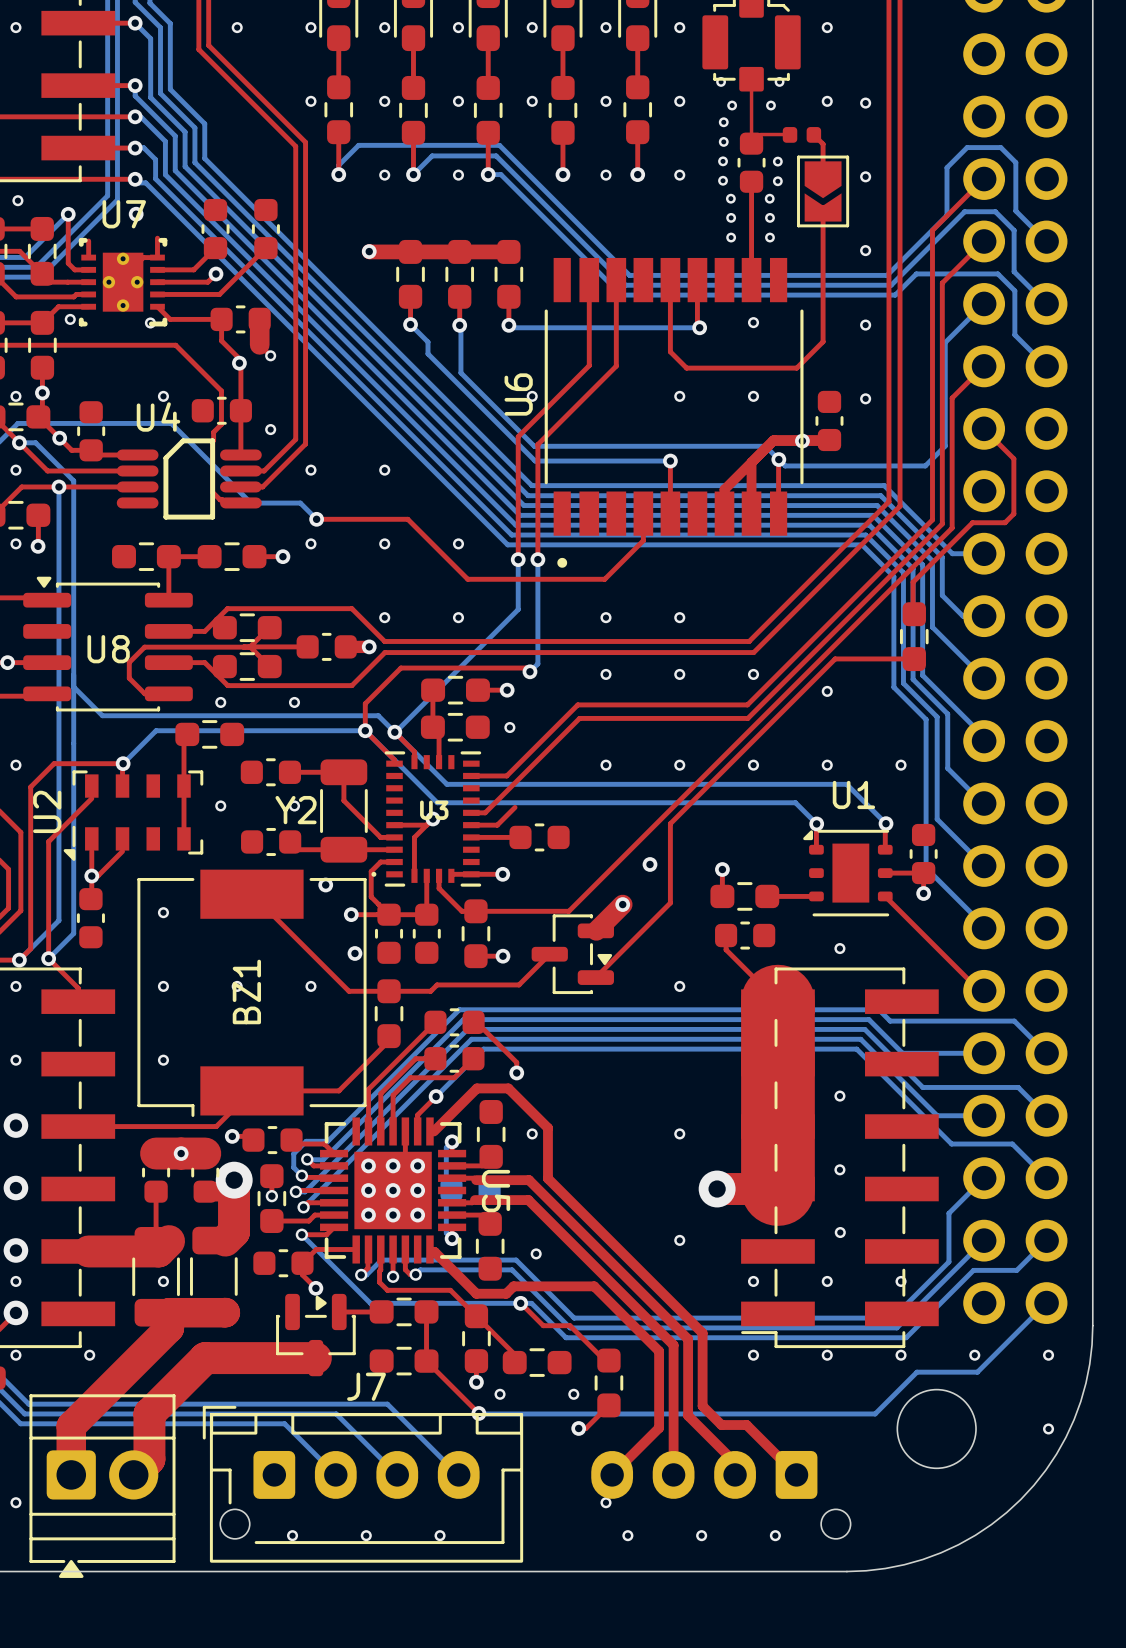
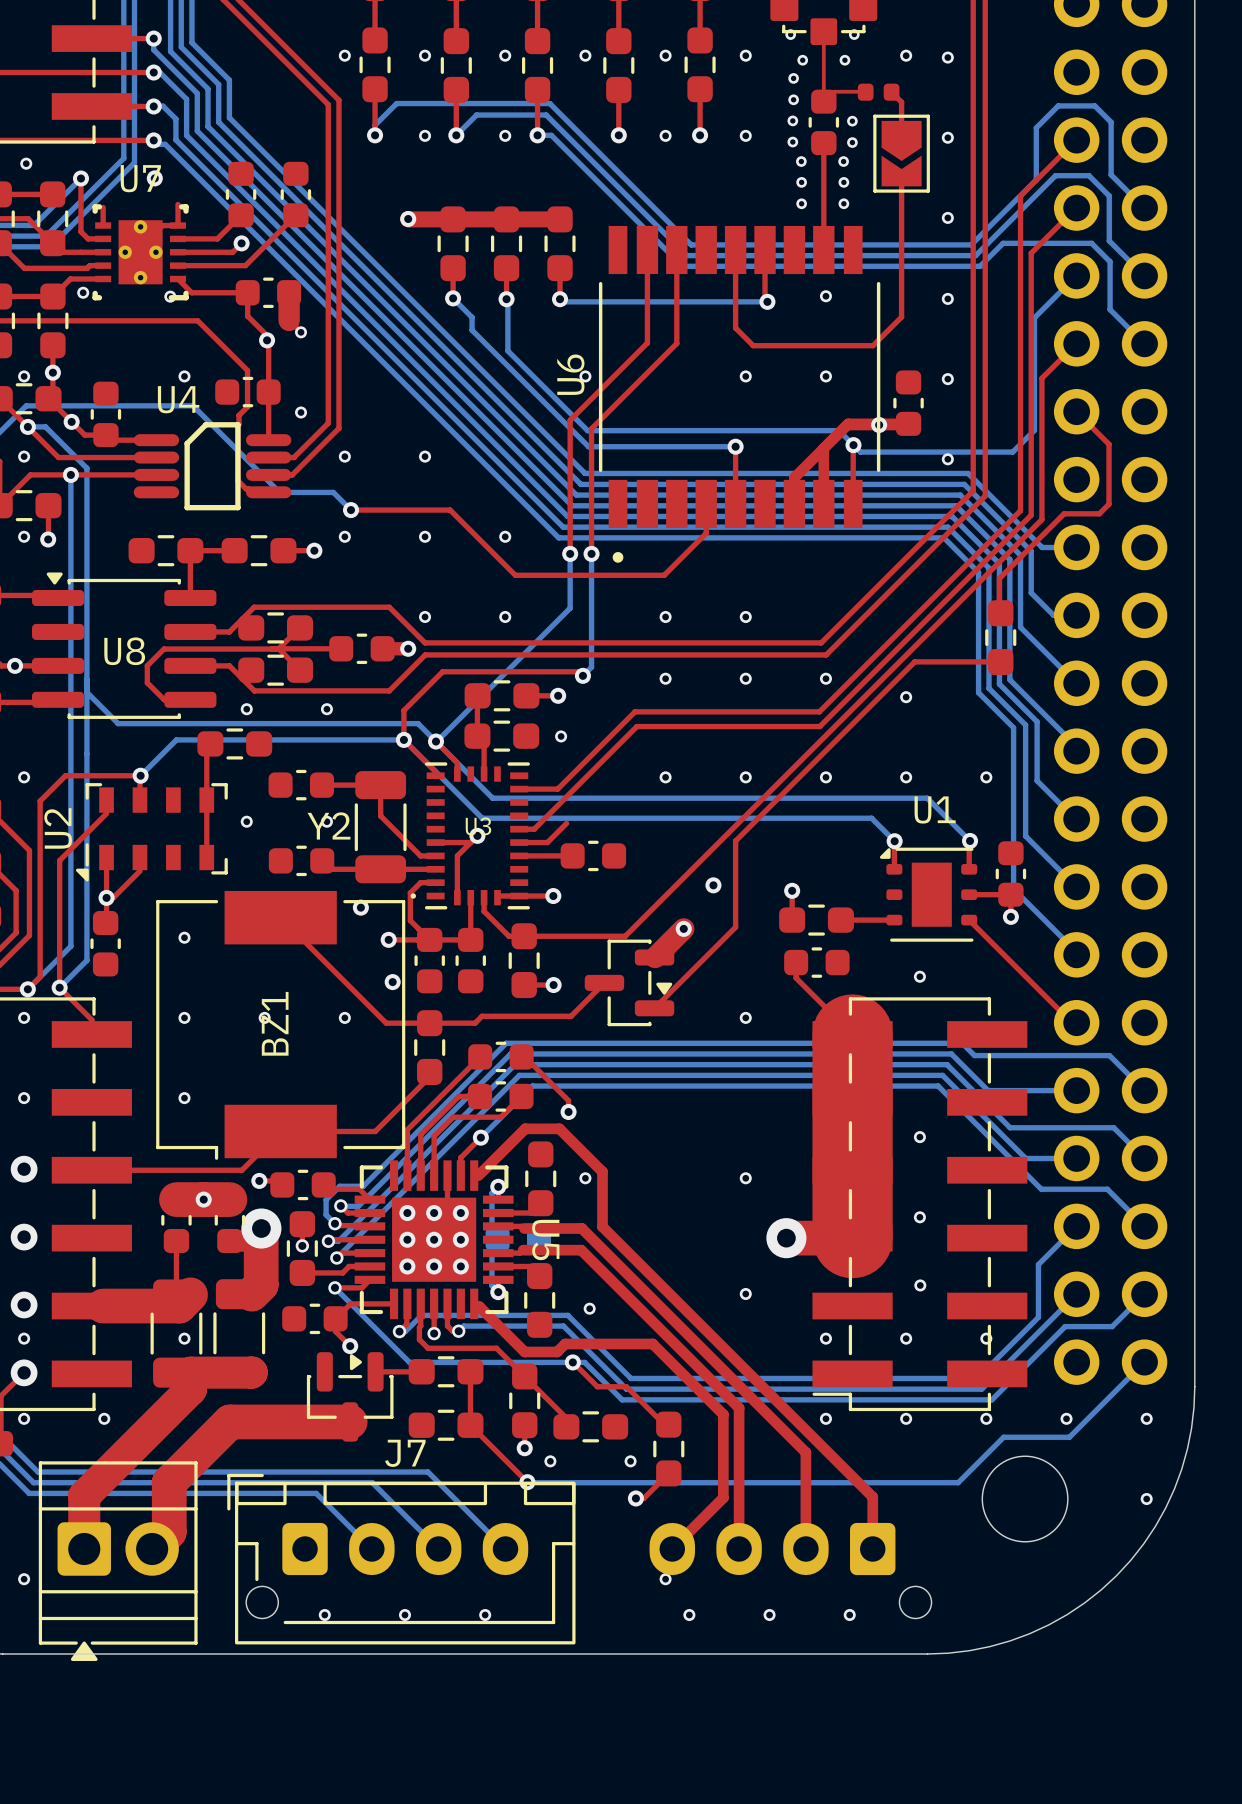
via: none -> (947, 459)
top track: (702, 1333) (702, 1406) (721, 1425) (746, 1425) (796, 1474) -> (770, 1394) (872, 1497) (872, 1548)
top track: (688, 1339) (688, 1415) (735, 1462) -> (754, 1401) (805, 1452) (805, 1535)

